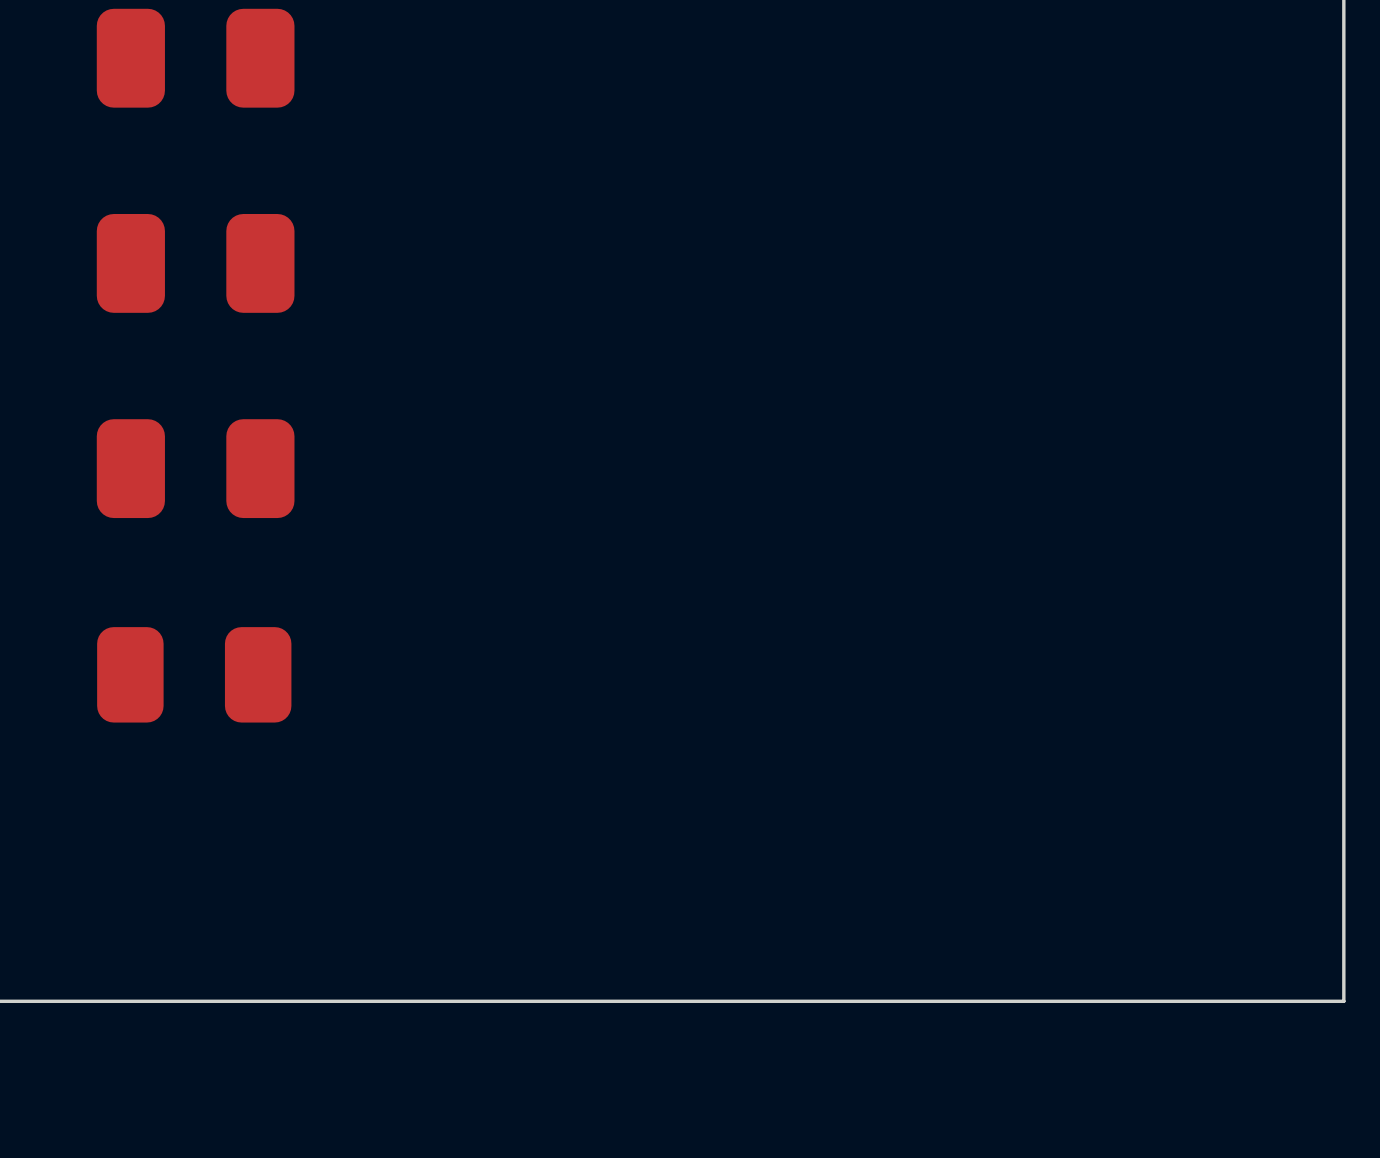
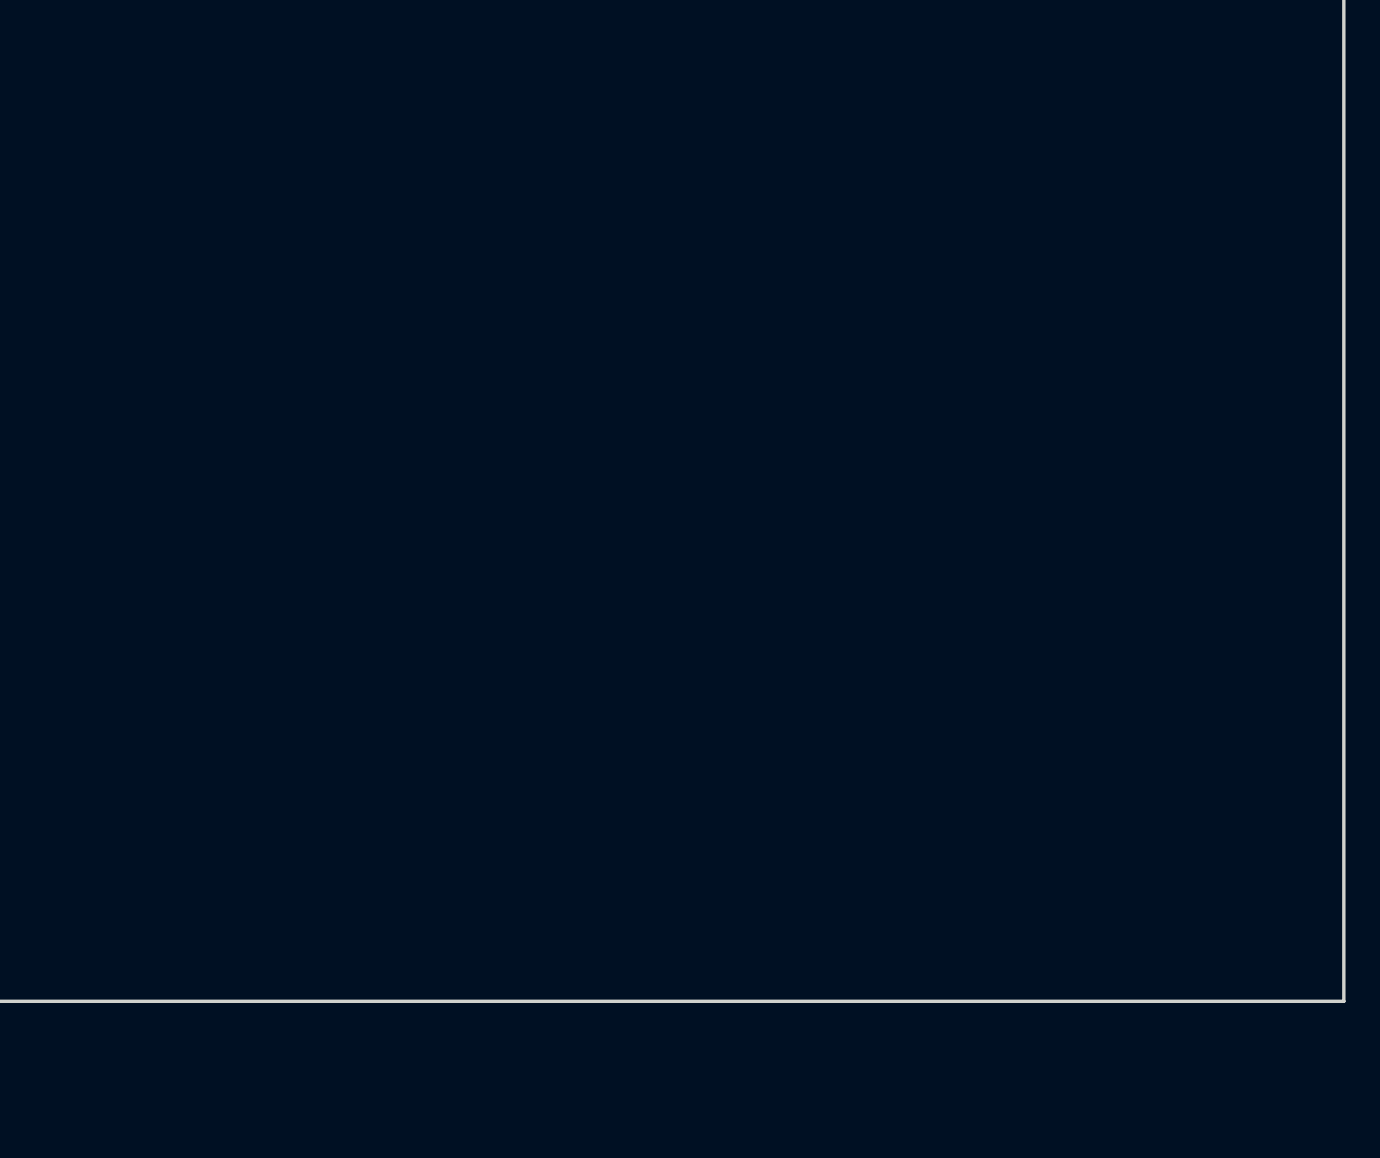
part: (195, 58) -> none
part: (195, 263) -> none
part: (195, 468) -> none
part: (194, 674) -> none

